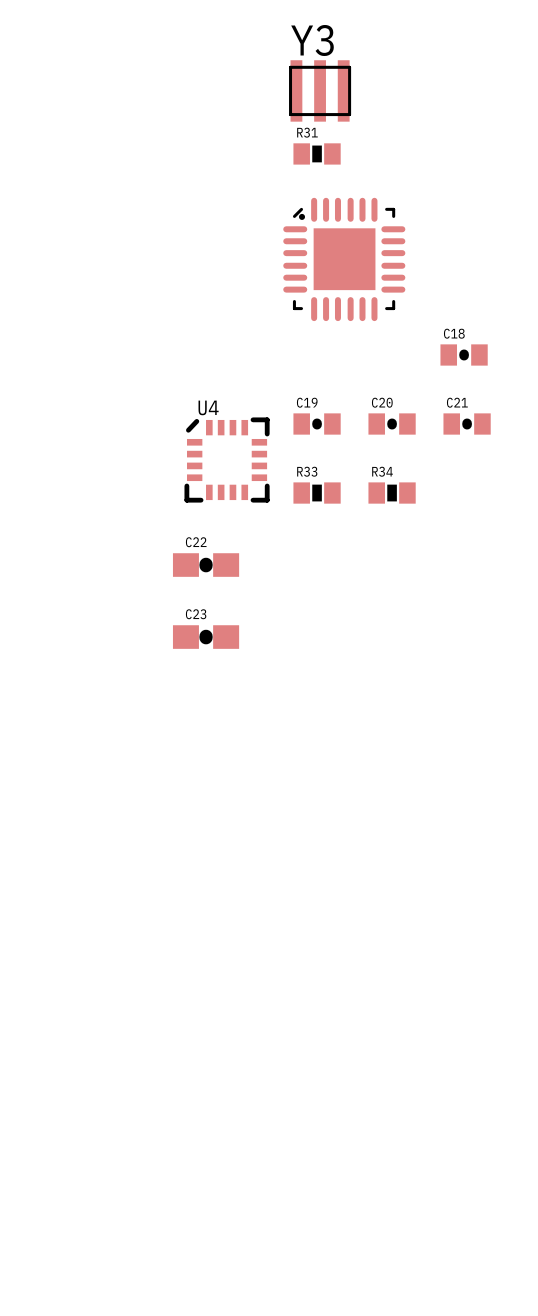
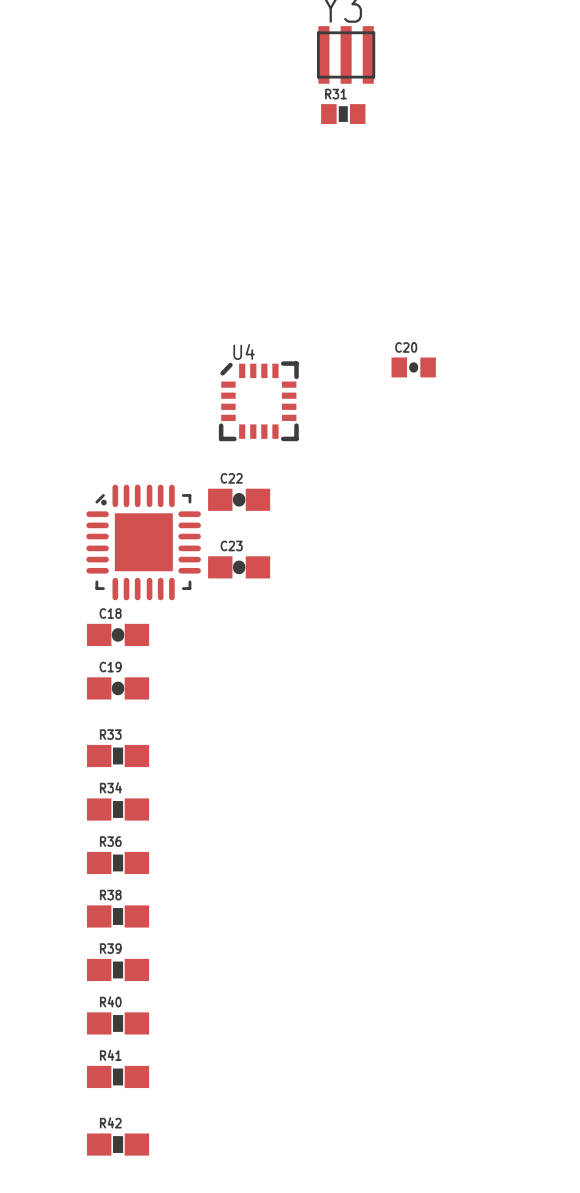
part position: (344, 259) -> (143, 542)
C18 footprint: [440, 344, 488, 366] -> [87, 623, 150, 647]
C19 footprint: [293, 413, 341, 435] -> [87, 677, 150, 700]
C21: (467, 424) -> none
R33 footprint: [293, 482, 341, 504] -> [87, 744, 150, 768]
R34 footprint: [368, 482, 416, 504] -> [87, 798, 150, 821]
R36: none -> (118, 862)
R38: none -> (118, 916)
R39: none -> (118, 969)
R40: none -> (118, 1023)
R41: none -> (118, 1076)
R42: none -> (118, 1144)

